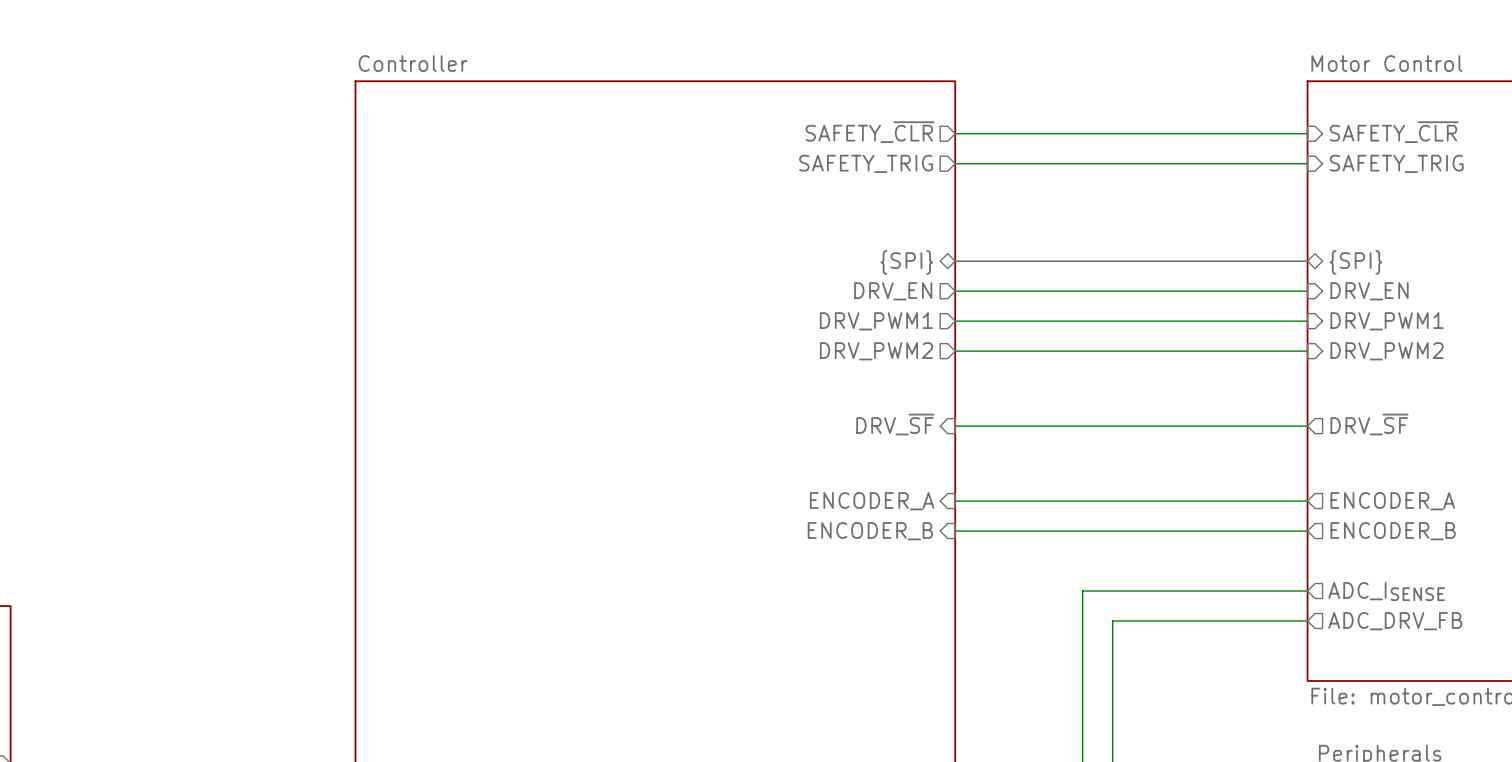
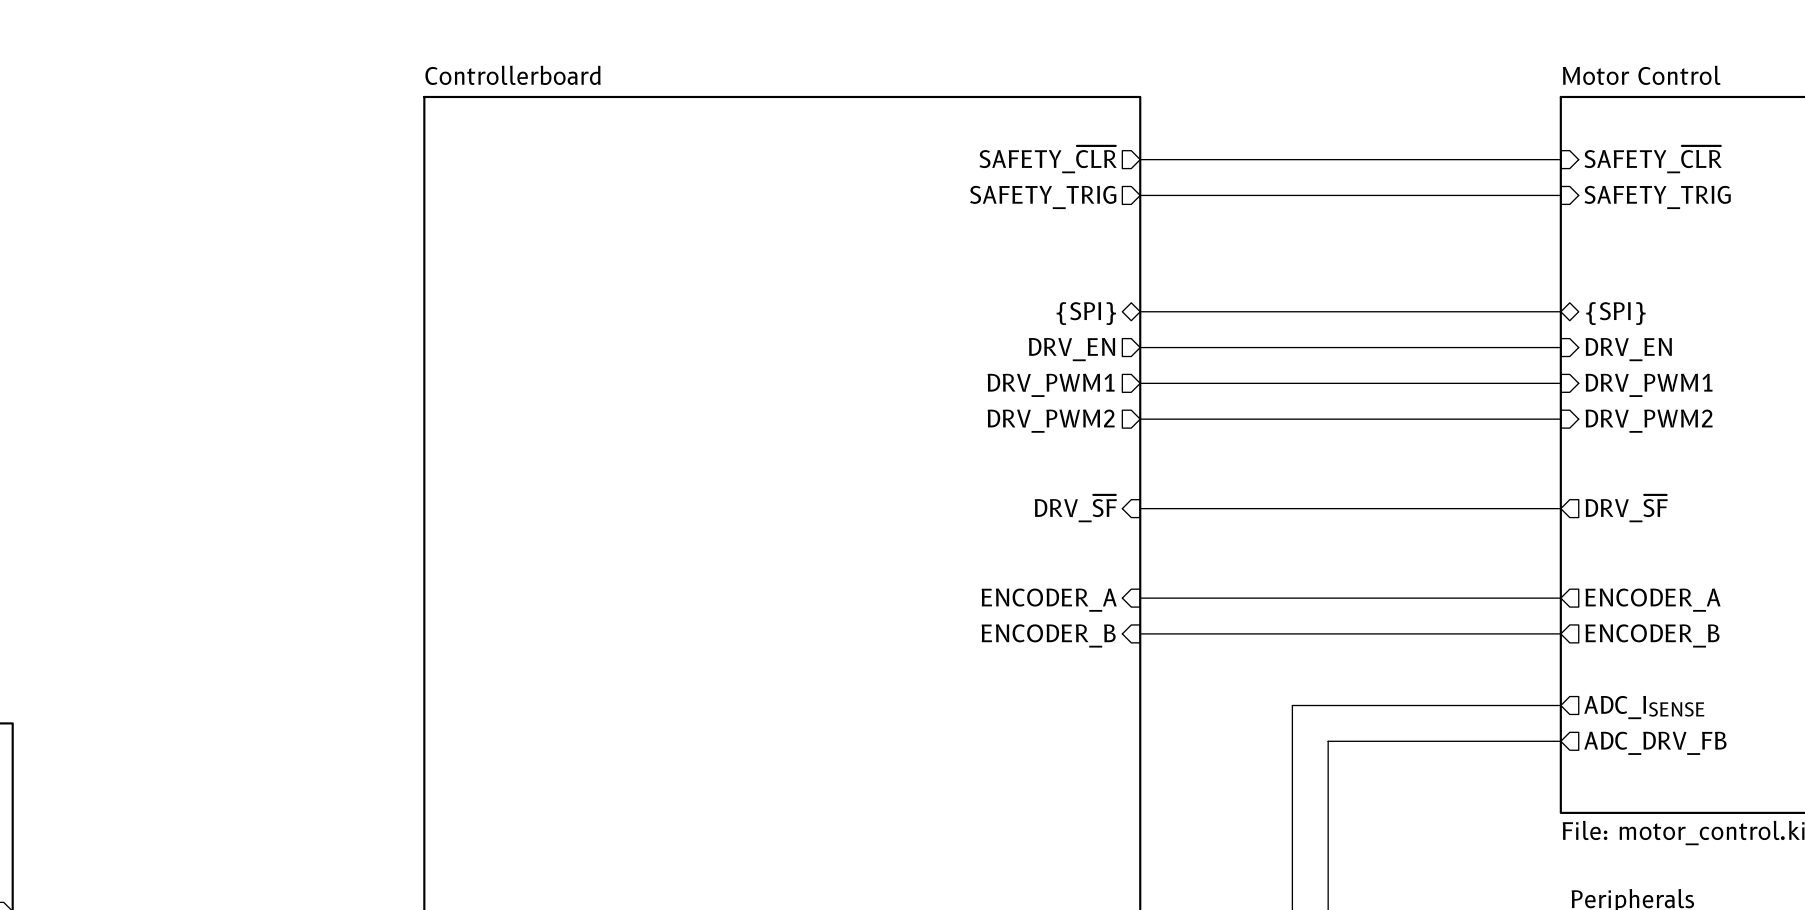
sheet Controller name: Controller (413, 63) -> Controllerboard (513, 75)

